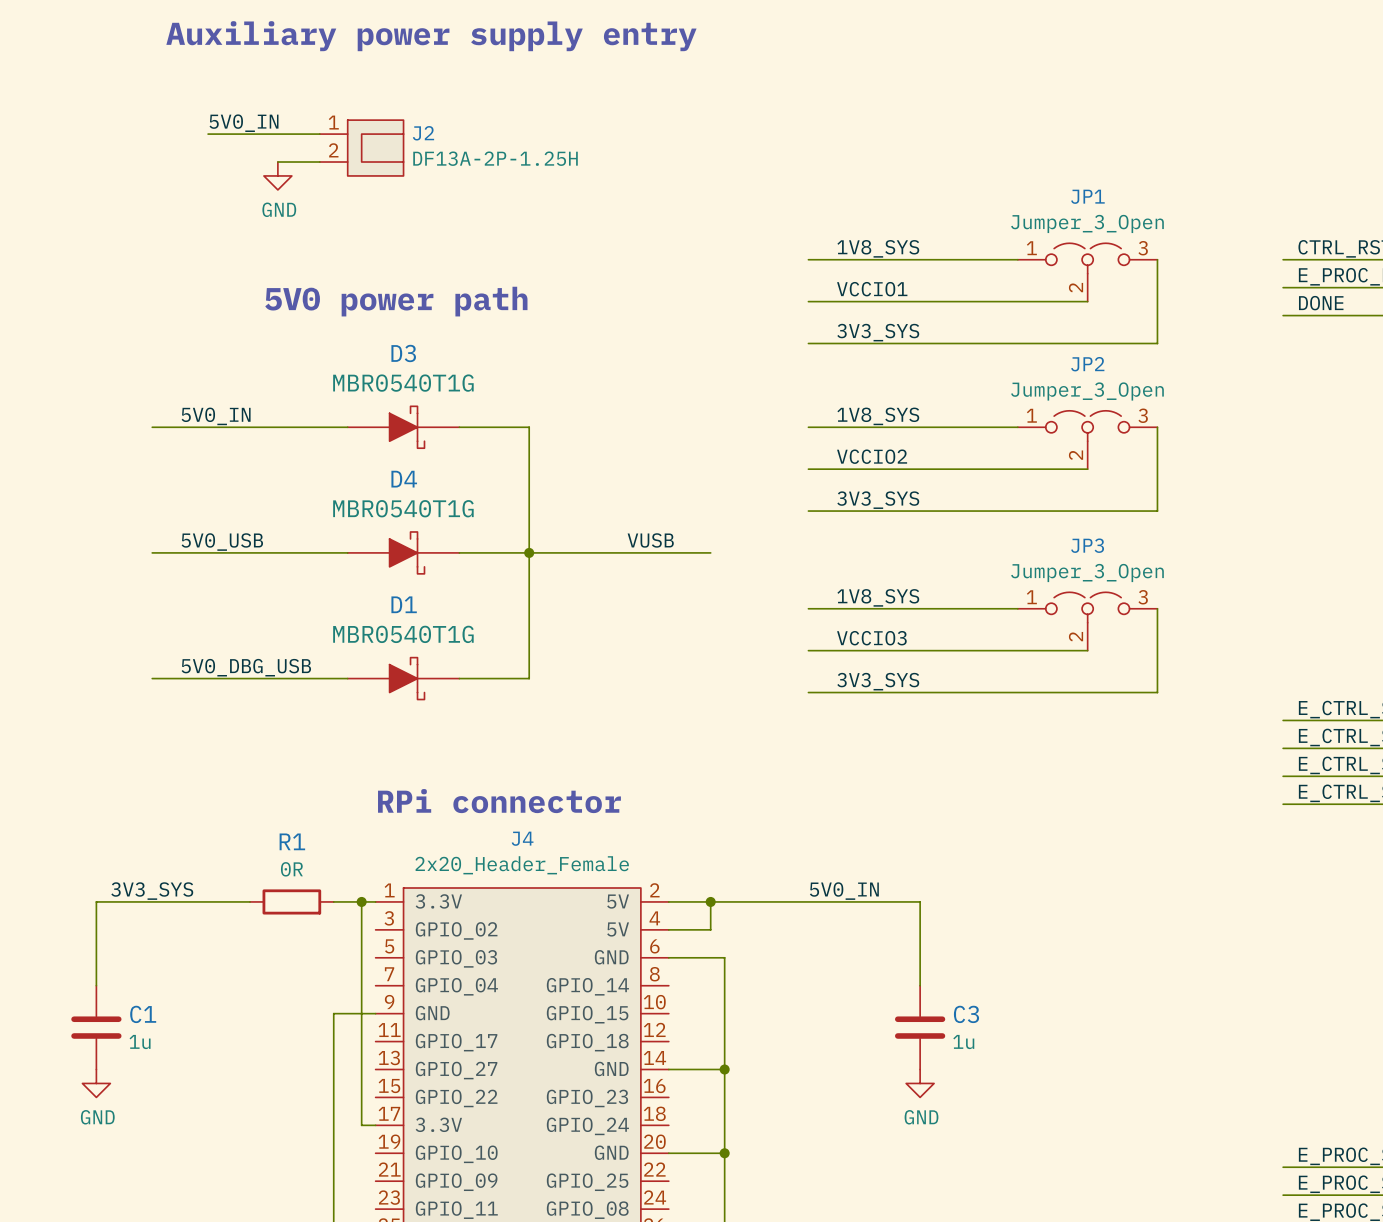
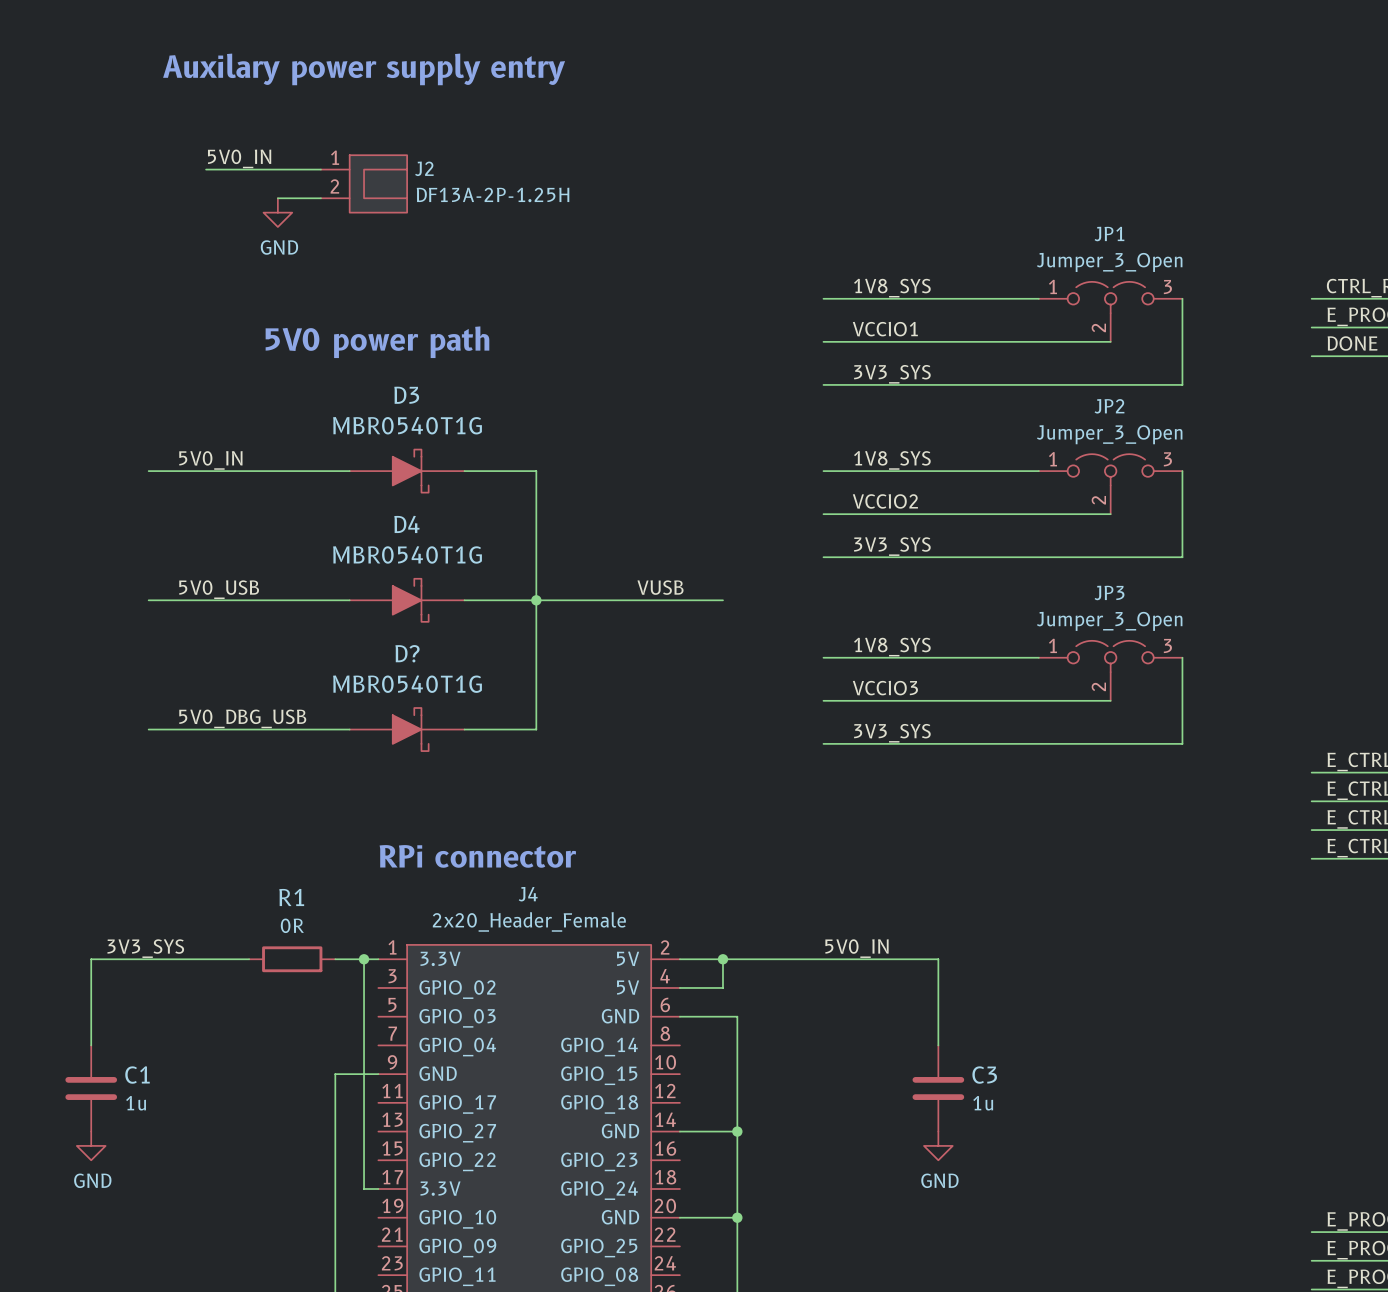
text: Auxiliary power supply entry (431, 36) -> Auxilary power supply entry (364, 69)
D1 name: D1 (404, 604) -> D? (407, 653)

